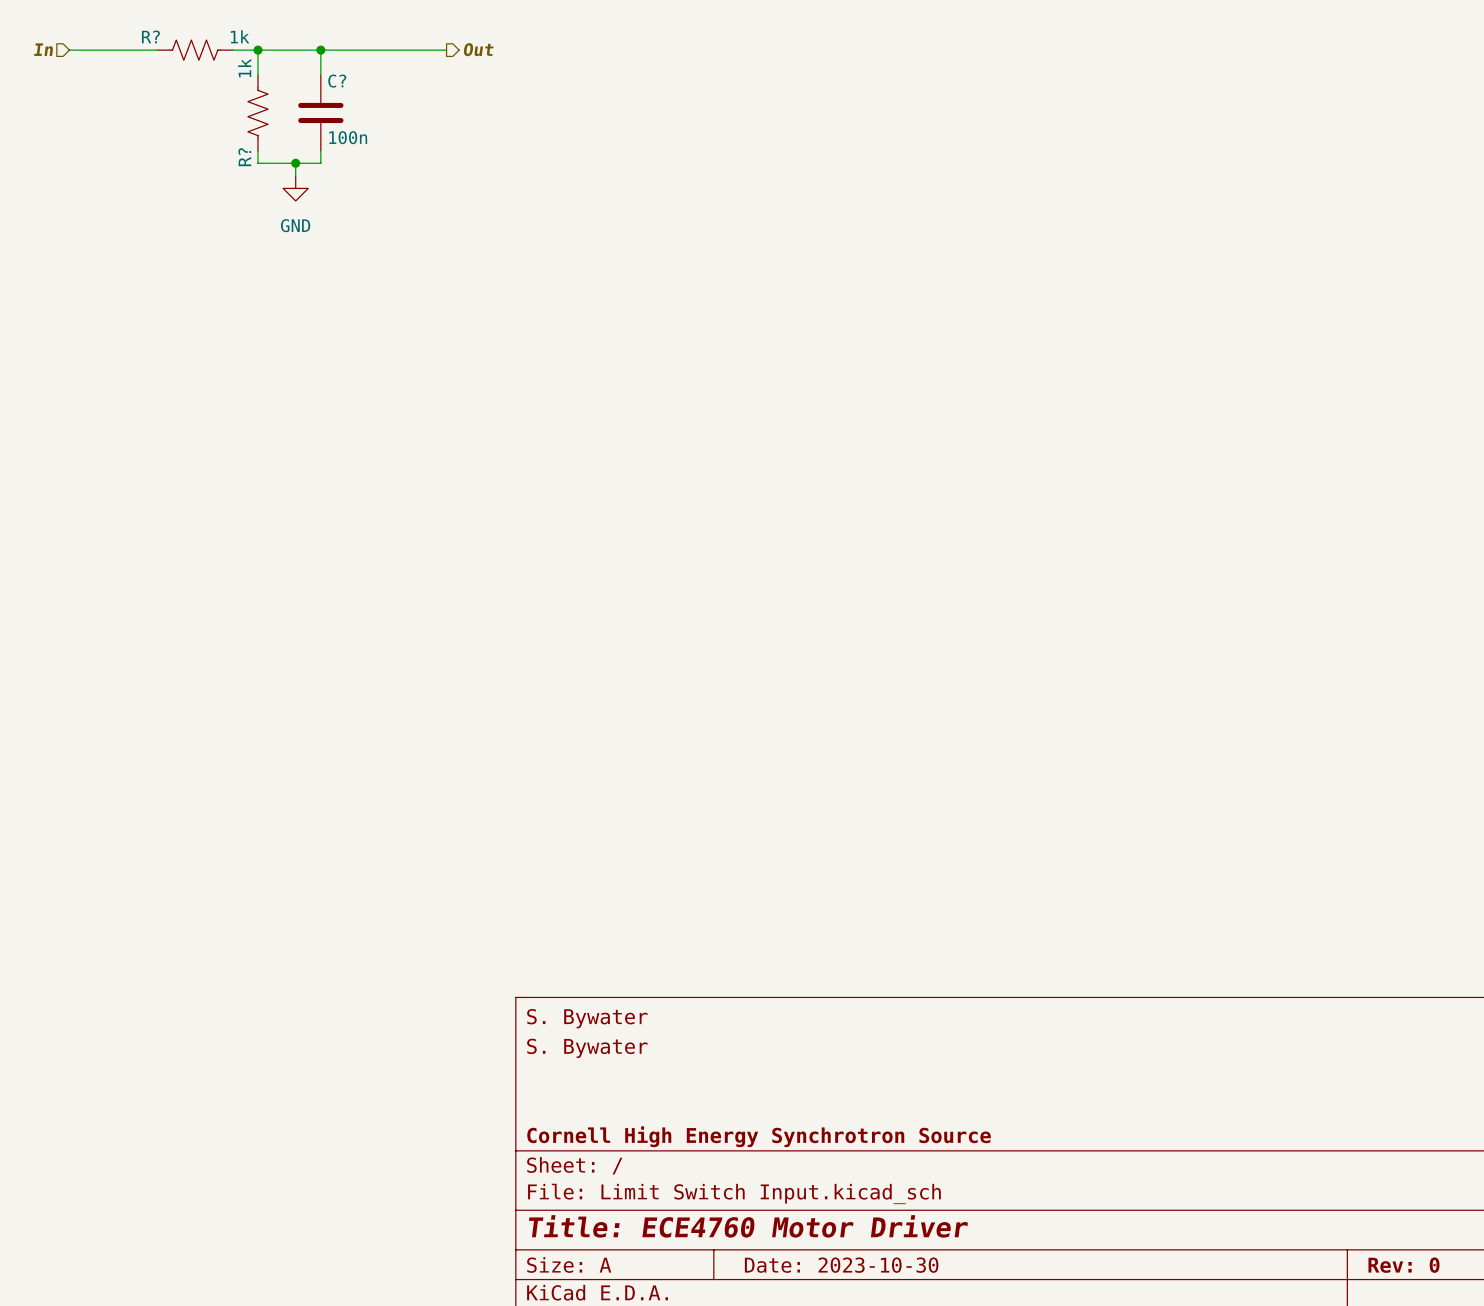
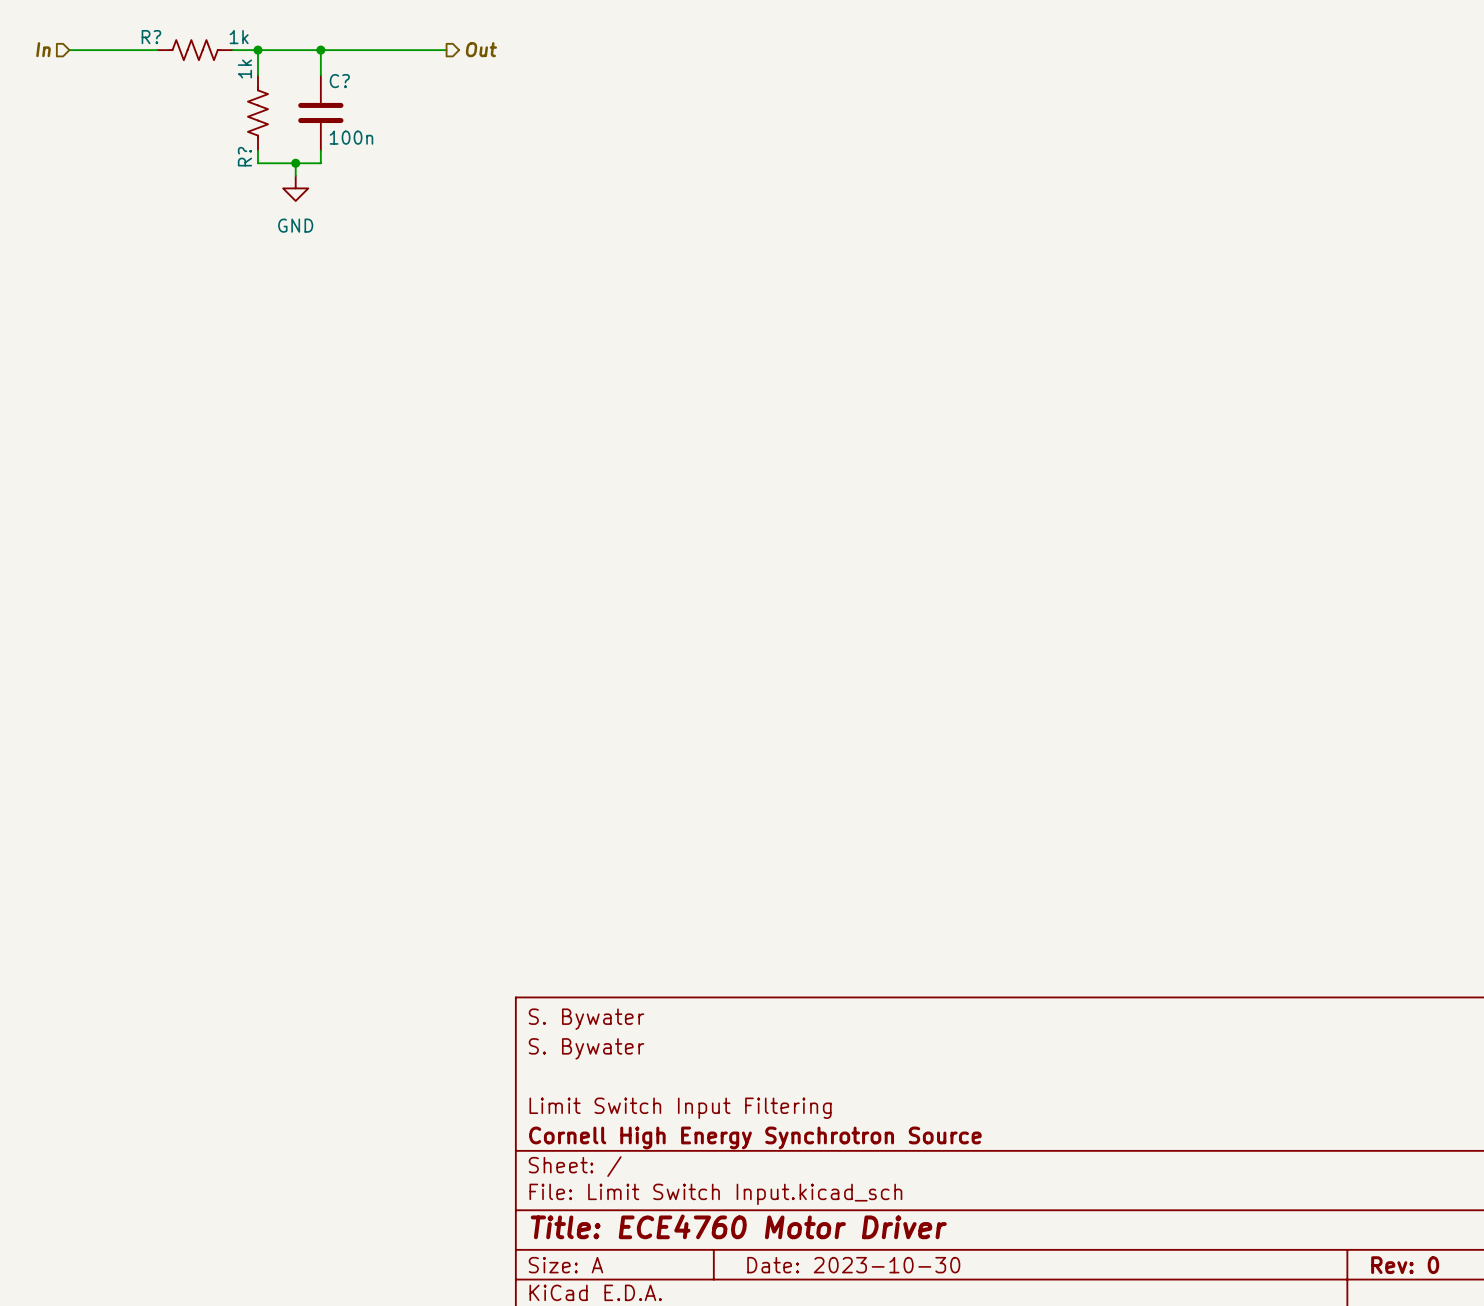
title block: none -> Limit Switch Input Filtering (680, 1108)

